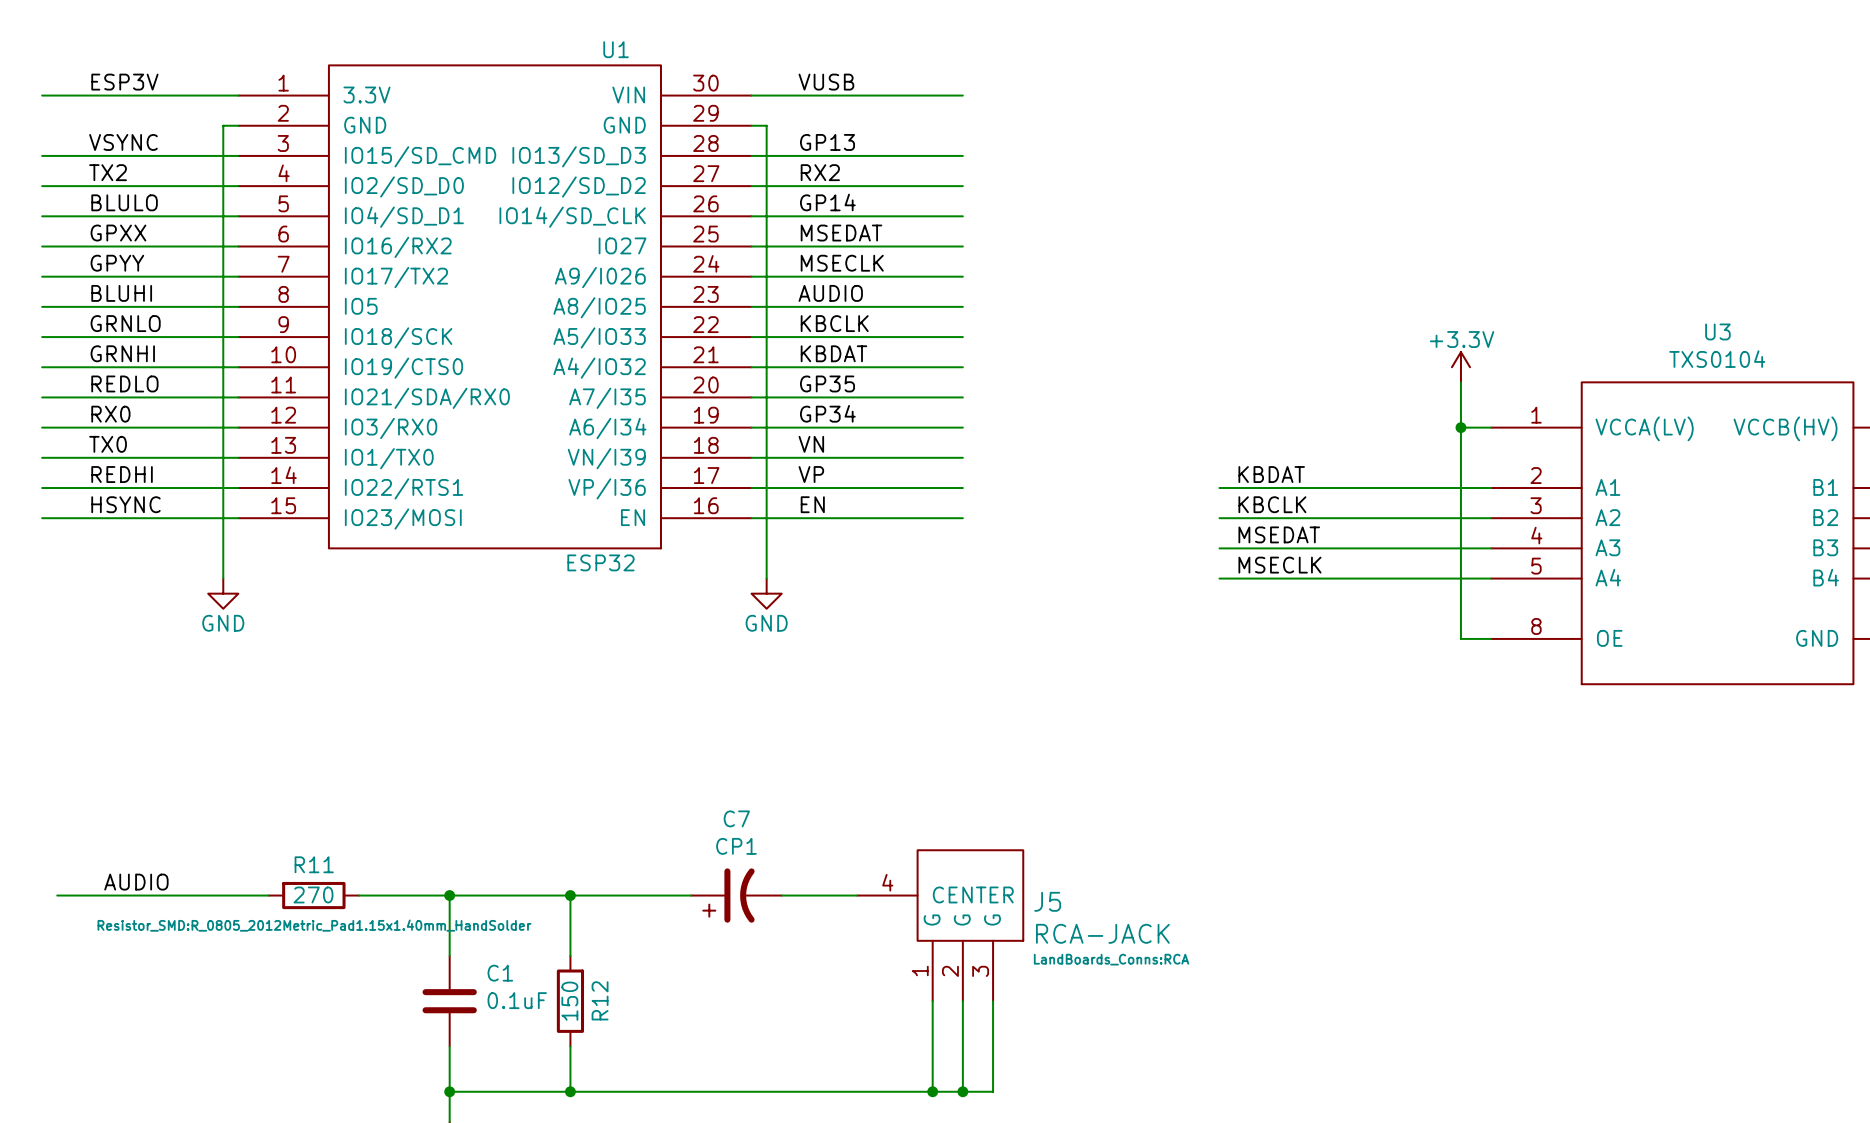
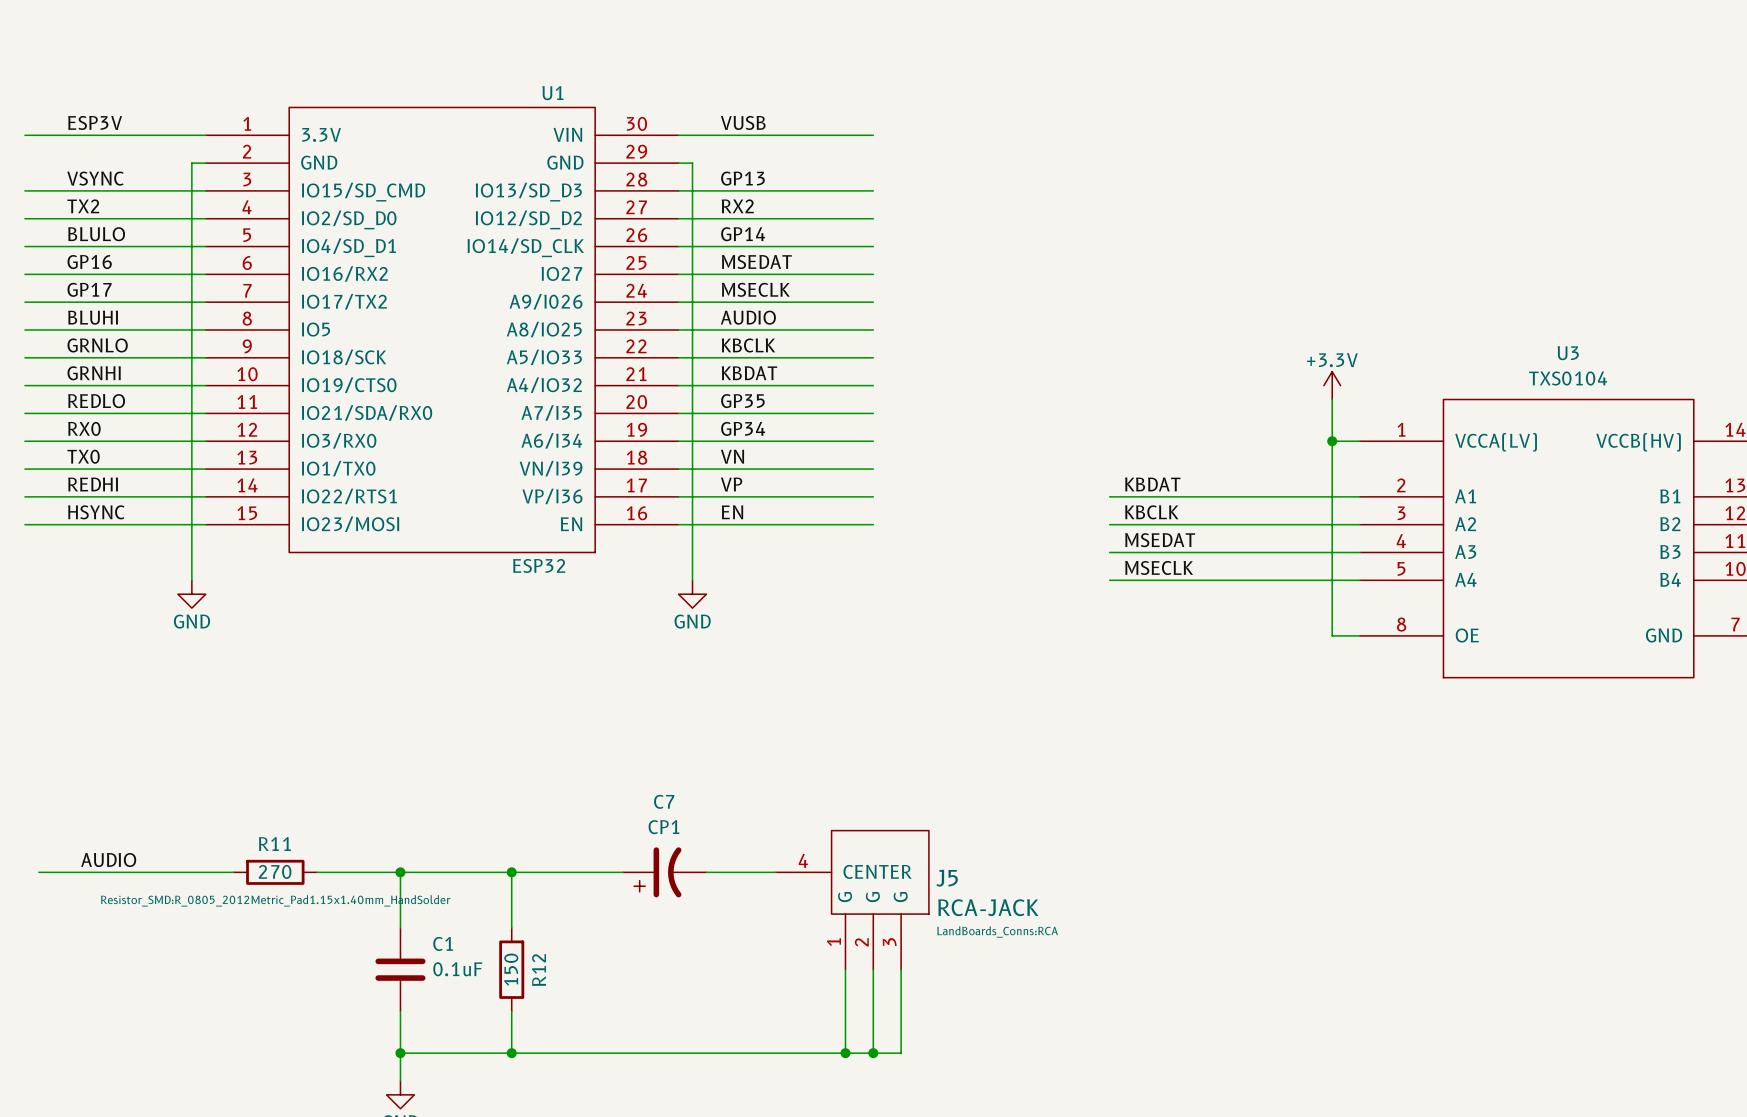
label: GPXX (118, 233) -> GP16 (89, 262)
label: GPYY (117, 263) -> GP17 (89, 289)

